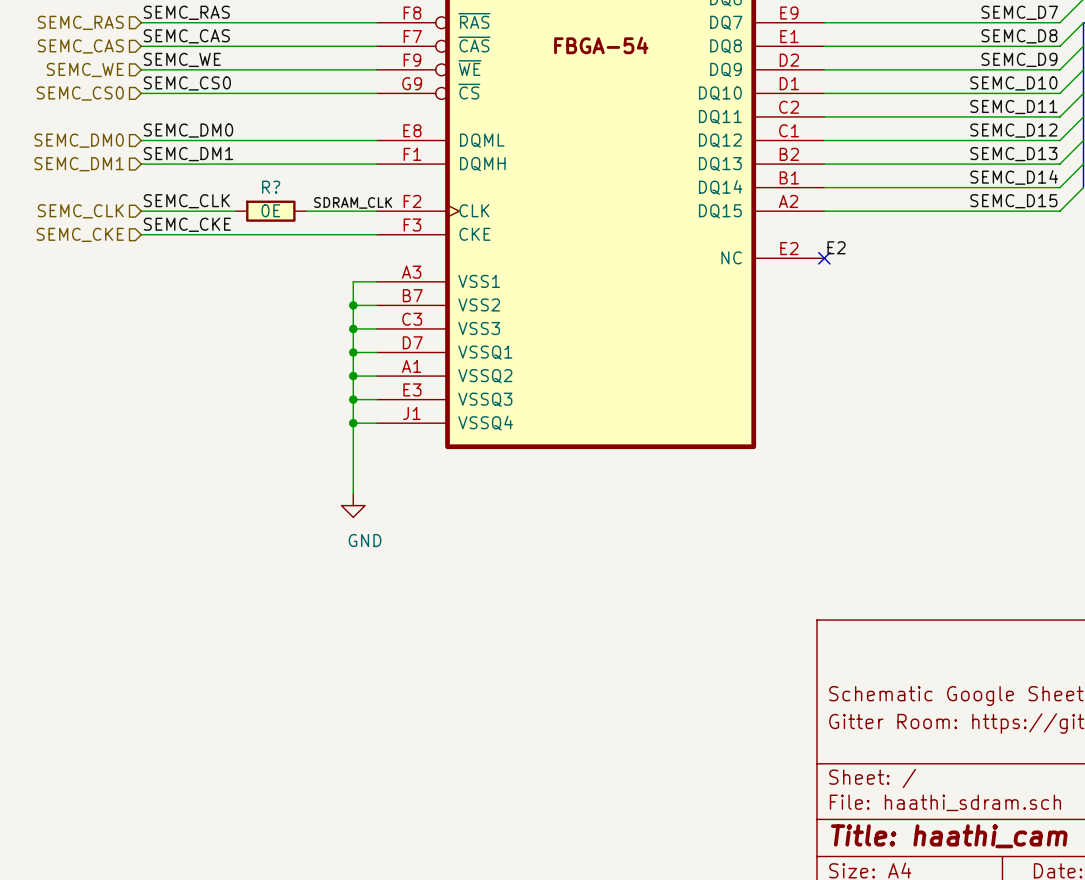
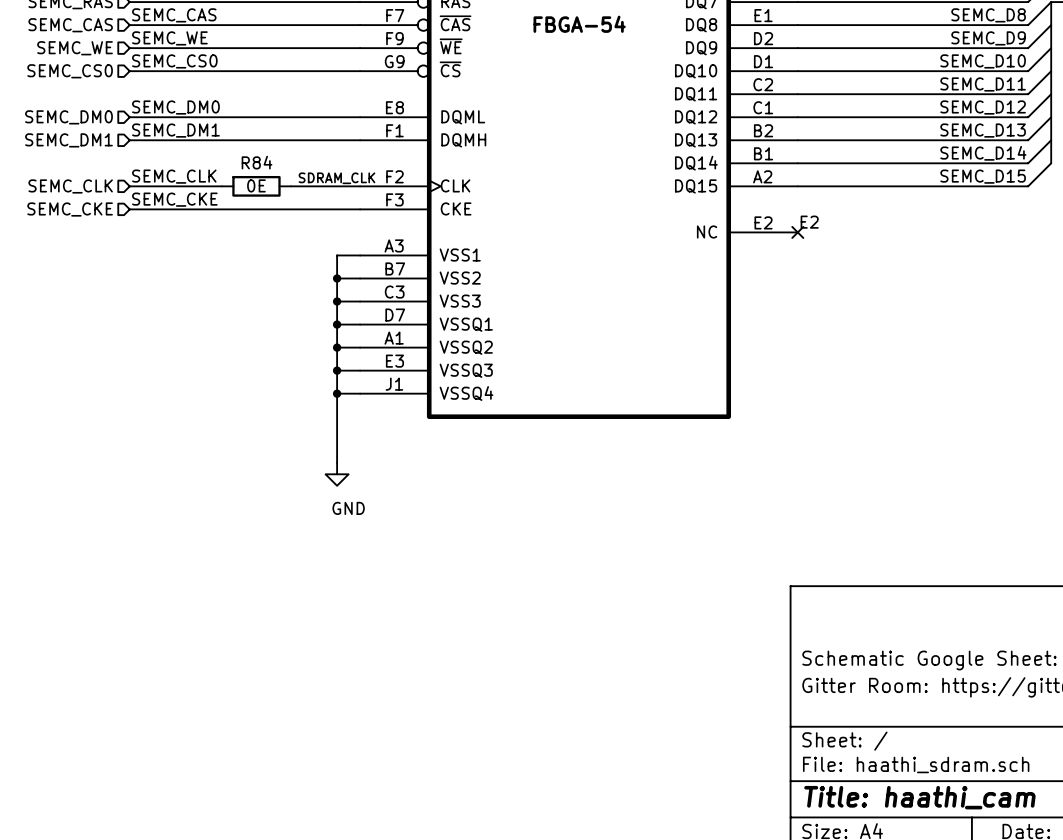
R? name: R? (271, 187) -> R84 (257, 162)

